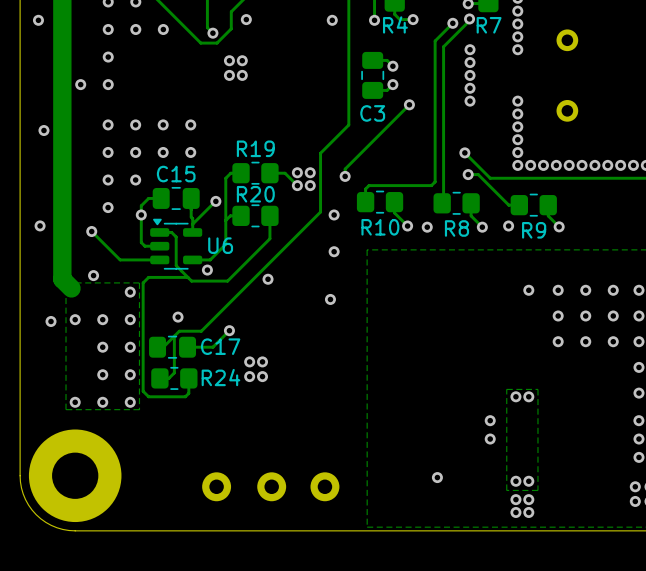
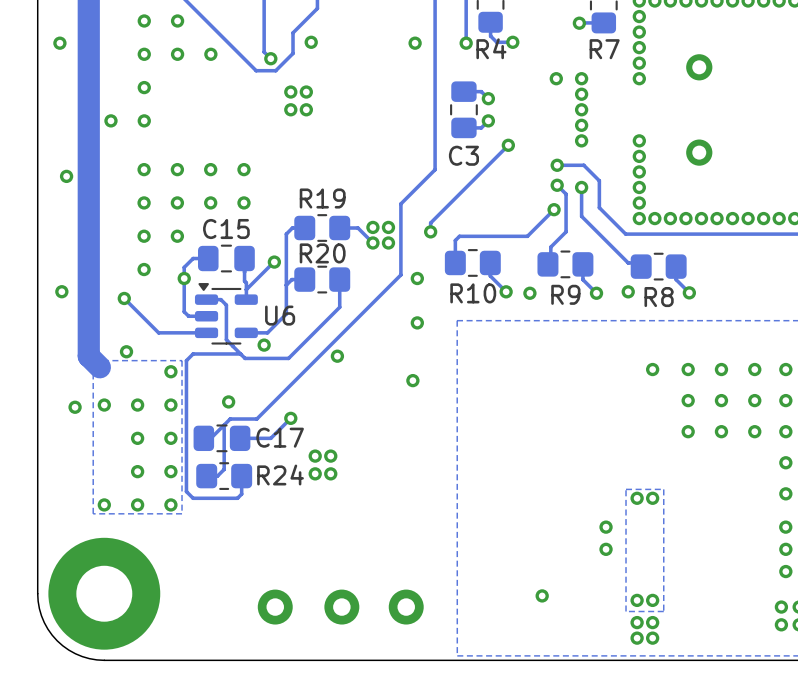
track: (469, 18) (443, 46) (443, 204) -> none
via: (469, 18) -> none
track: (452, 23) (435, 41) (435, 181) (431, 185) (369, 185) (365, 189) -> (554, 209) (527, 236) (459, 236) (455, 240) (455, 247)
via: (452, 23) -> none
via: none -> (556, 78)
via: none -> (557, 165)
track: none -> (557, 185) (566, 194) (566, 231) (550, 247) (550, 262)
via: none -> (557, 185)
track: none -> (581, 187) (581, 216) (628, 262) (646, 262)
via: none -> (581, 187)
track: (464, 152) (490, 178) (506, 178) -> (557, 165) (583, 165) (599, 180) (599, 207) (625, 234)
via: (464, 152) -> none
via: none -> (554, 209)
track: (468, 174) (478, 174) (508, 205) (519, 205) -> none
via: (468, 174) -> none
R8 name: R8 (456, 228) -> R9 (565, 294)
R9 name: R9 (534, 230) -> R8 (659, 297)

